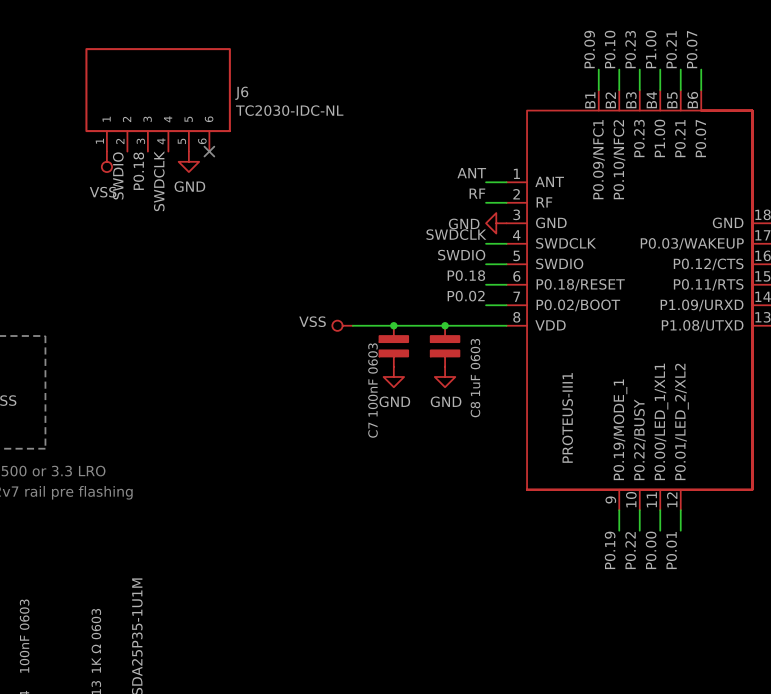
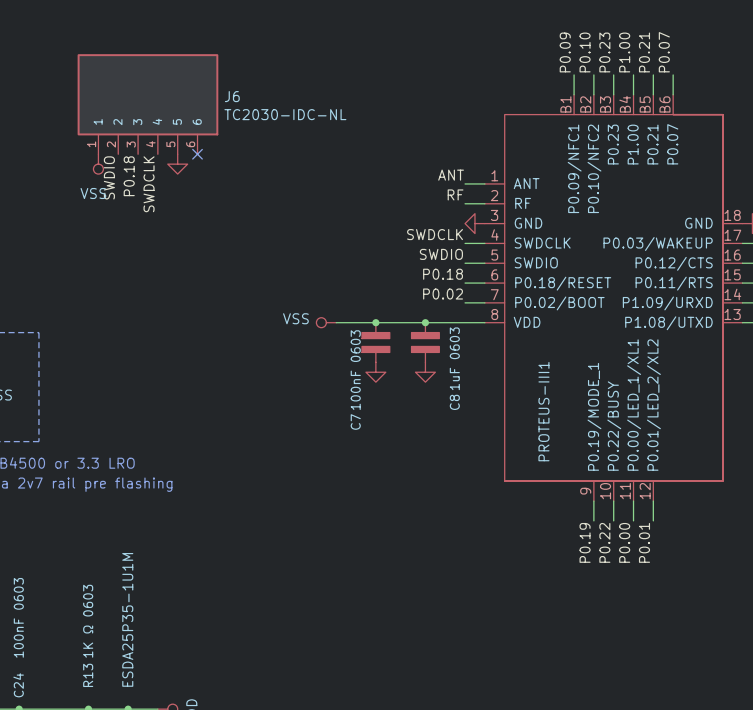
power symbol text: GND (189, 186) -> none
power symbol text: GND (464, 223) -> none
power symbol text: GND (394, 401) -> none
power symbol text: GND (446, 401) -> none

